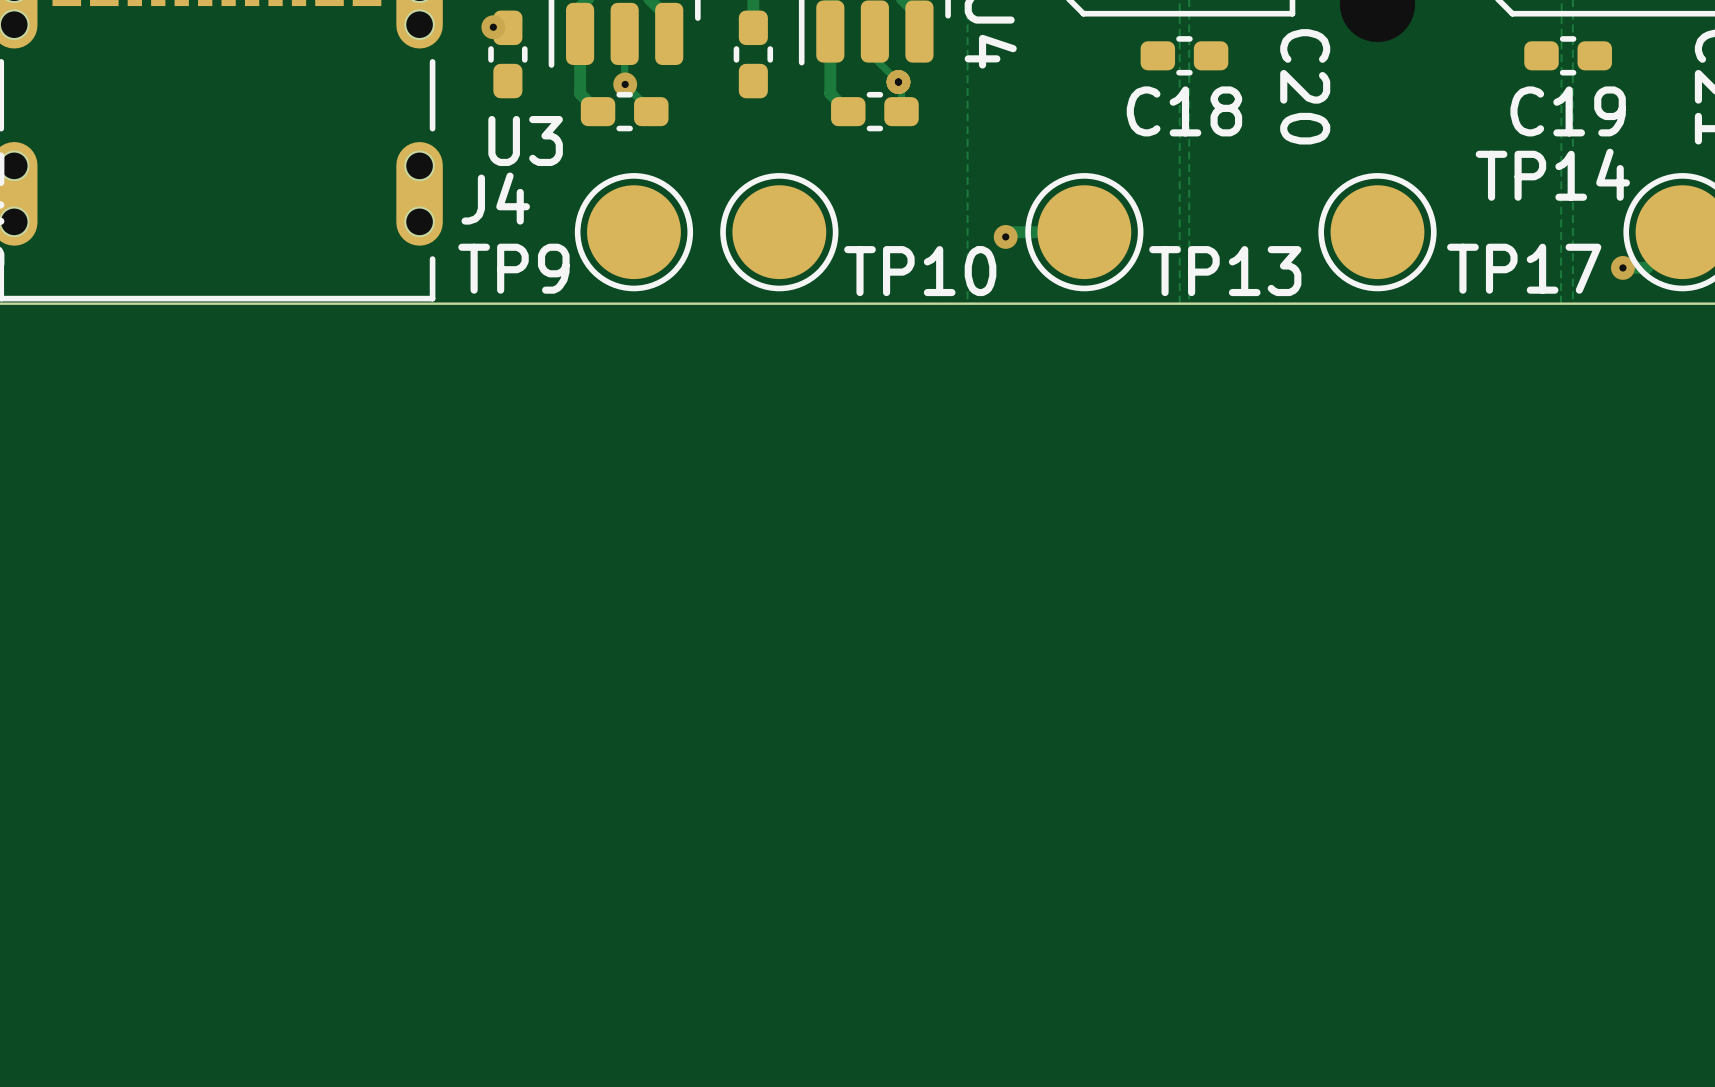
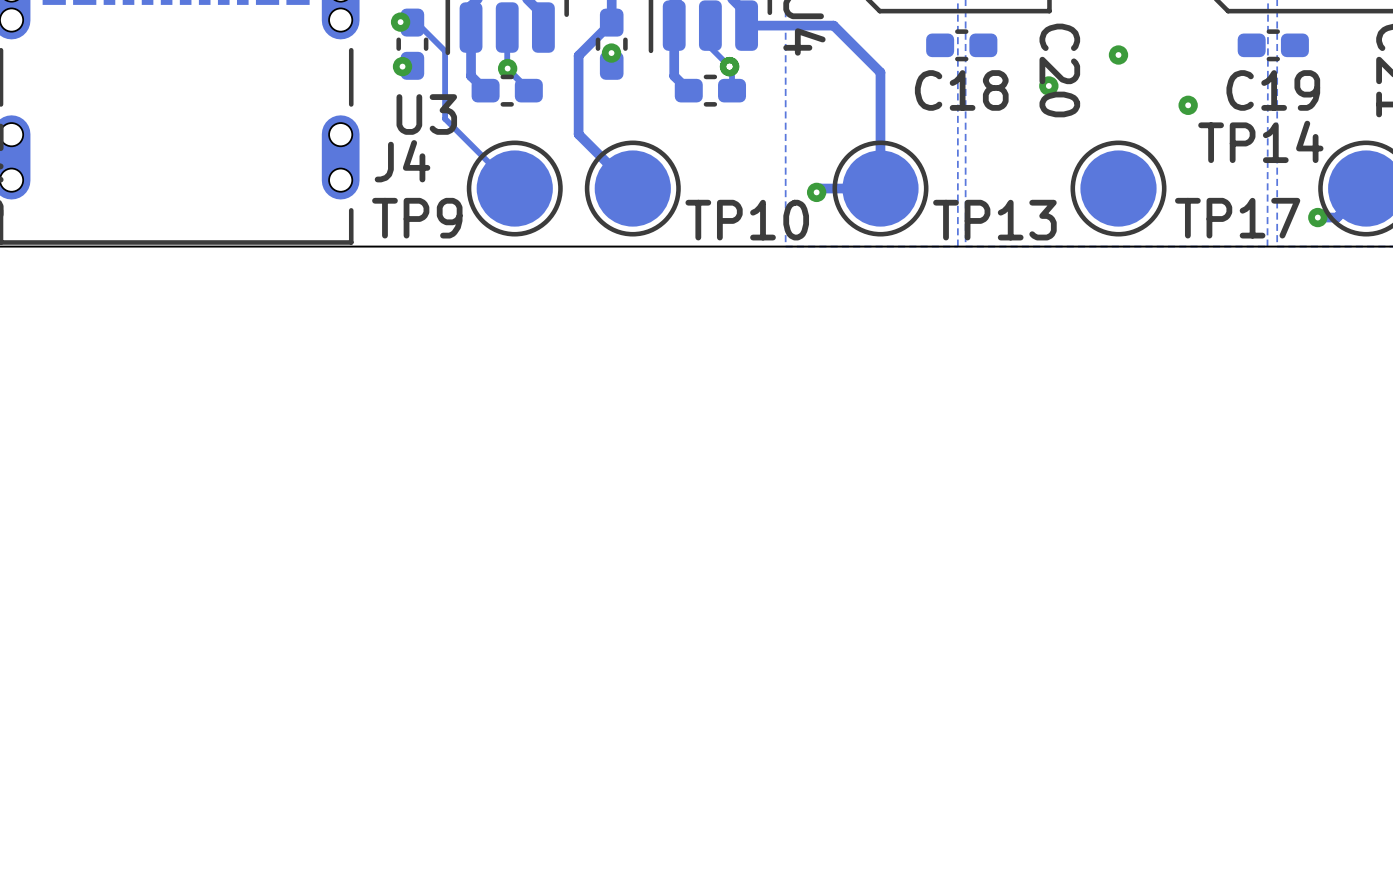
track: none -> (412, 22) (416, 22) (445, 51) (445, 118) (514, 188)
track: none -> (611, 22) (578, 55) (578, 134) (632, 188)
track: none -> (746, 25) (833, 25) (880, 72) (880, 188)
via: none -> (611, 53)
via: none -> (1118, 55)
via: none -> (402, 66)
via: none -> (1048, 85)
via: none -> (1188, 105)

